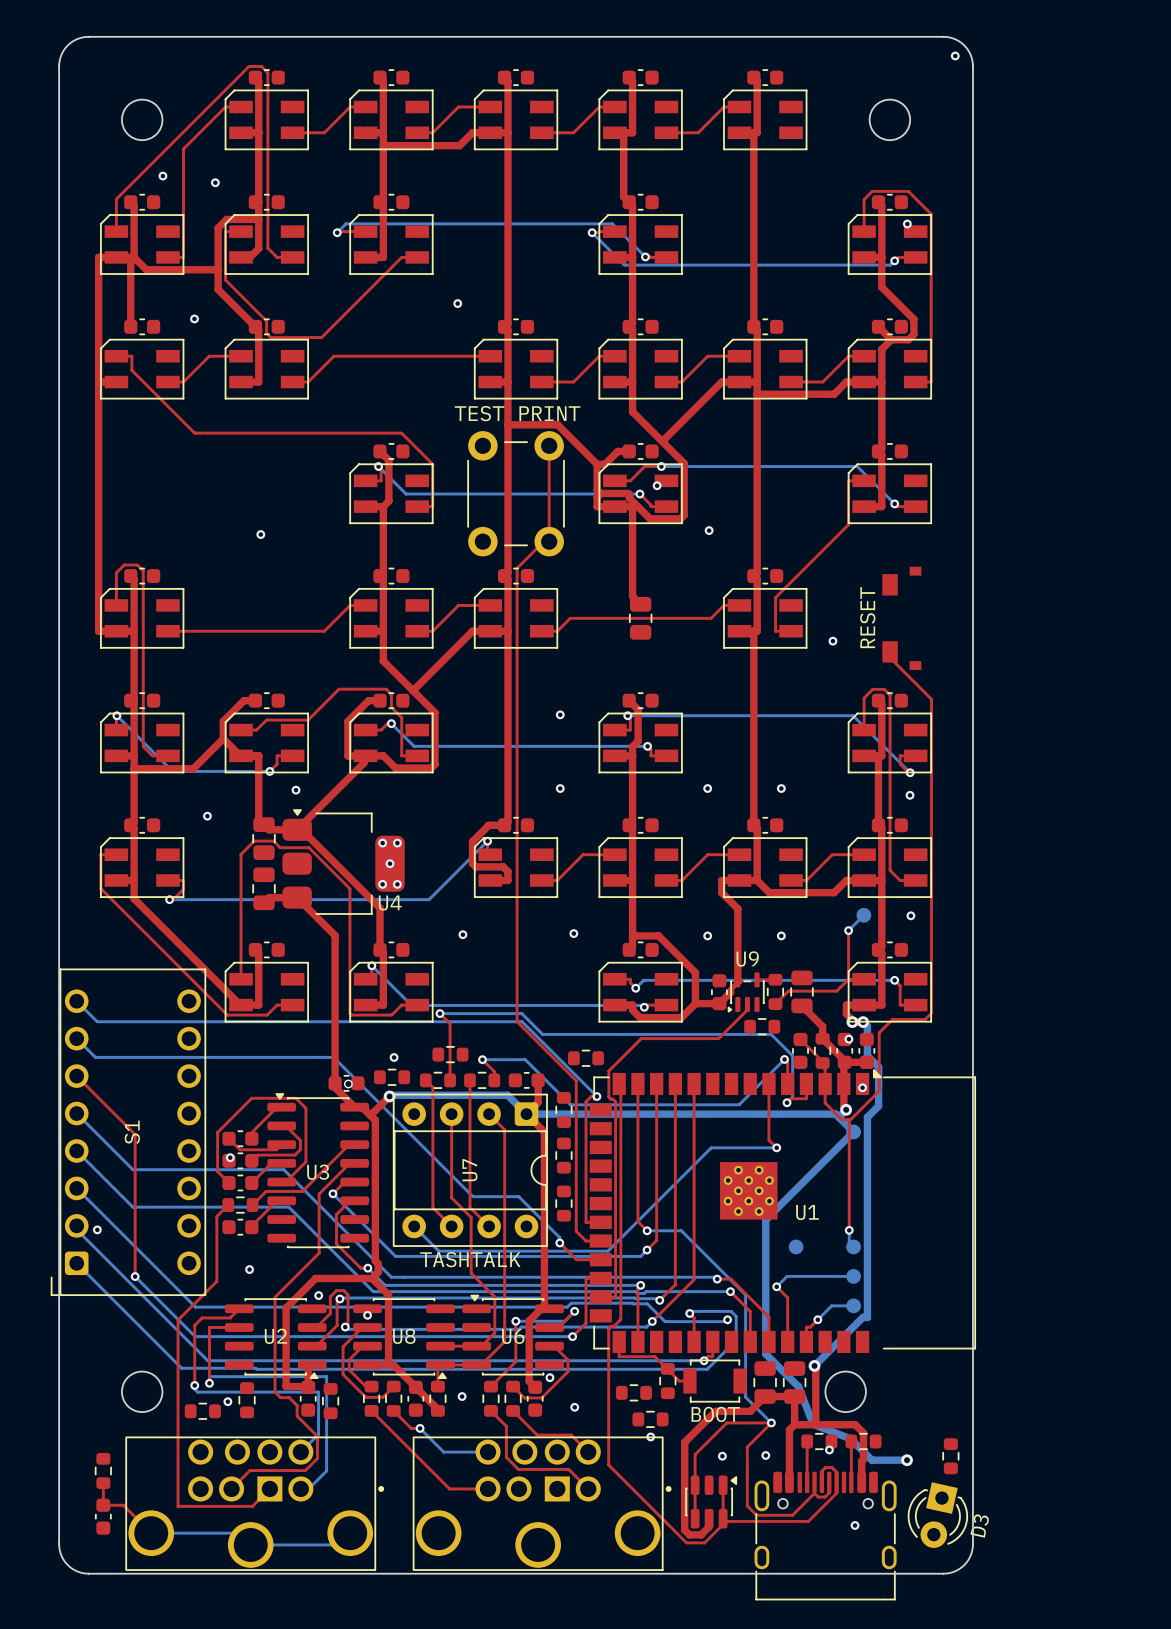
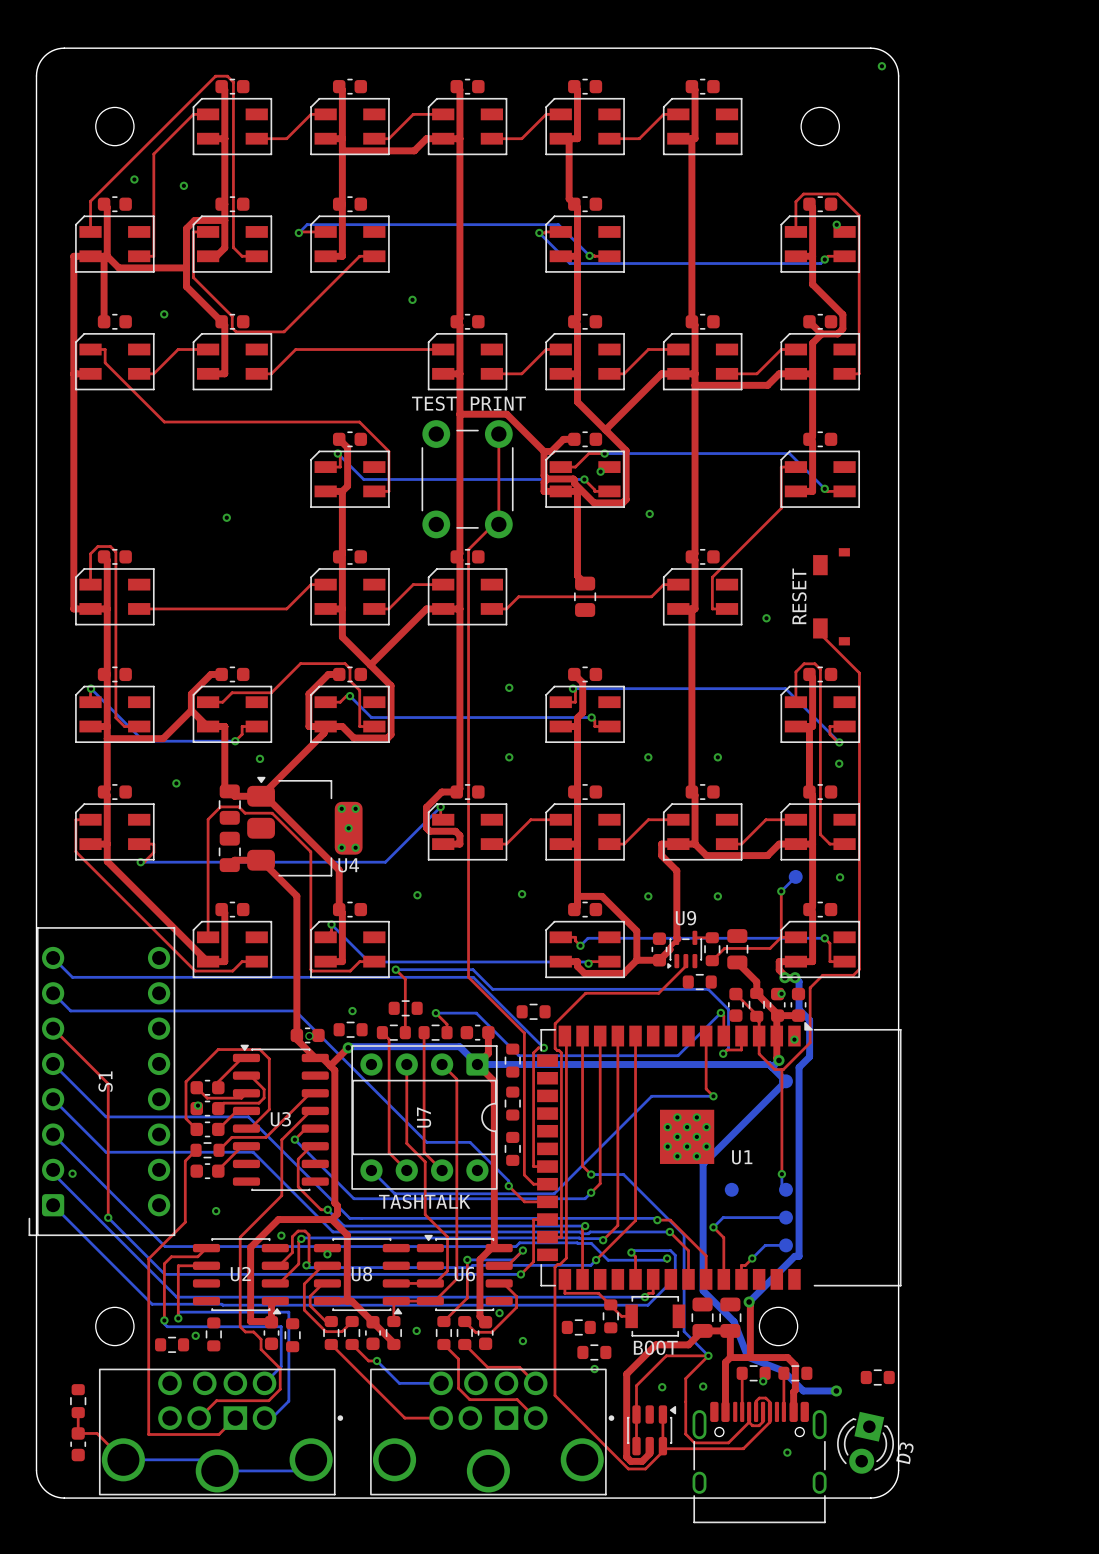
part rotation: 0° (950, 1456) -> 90° clockwise (877, 1377)

